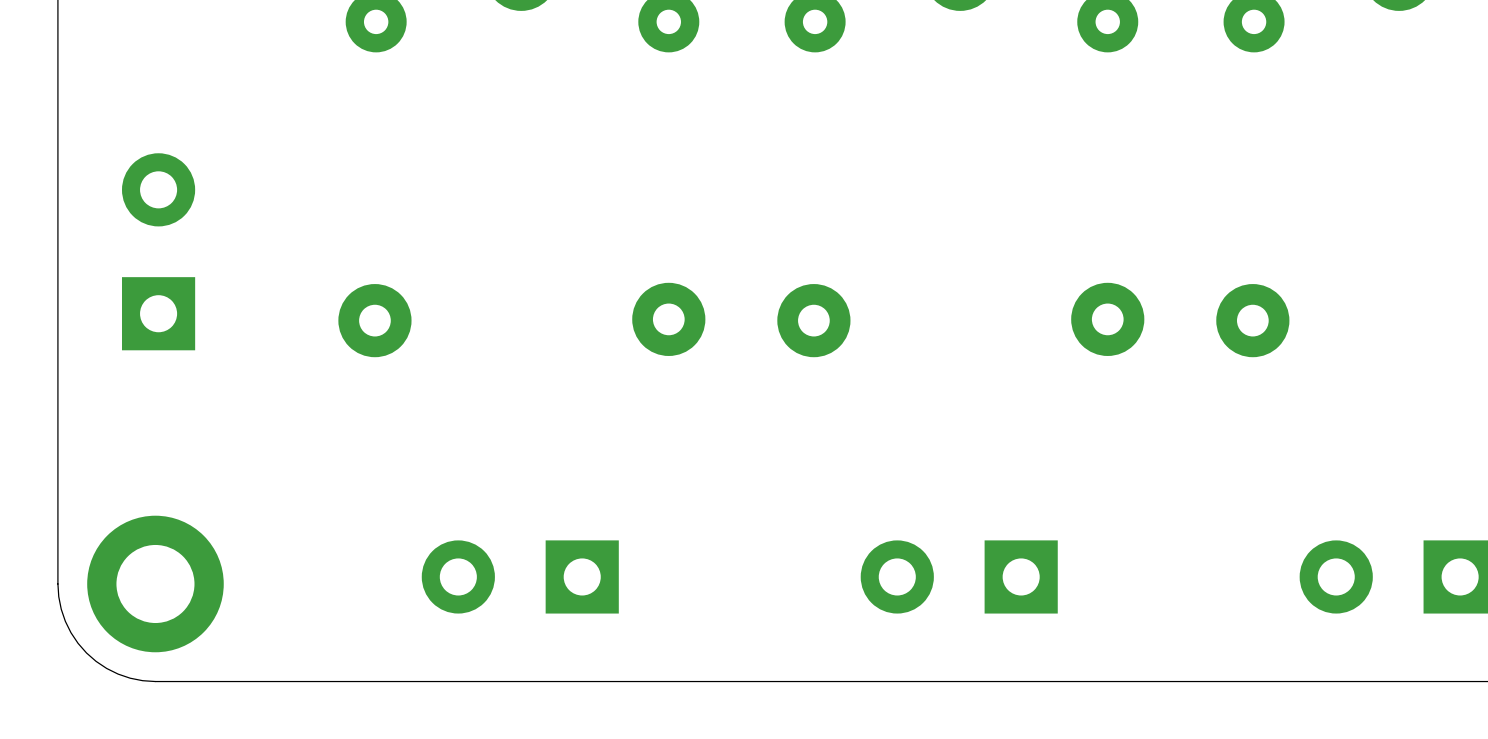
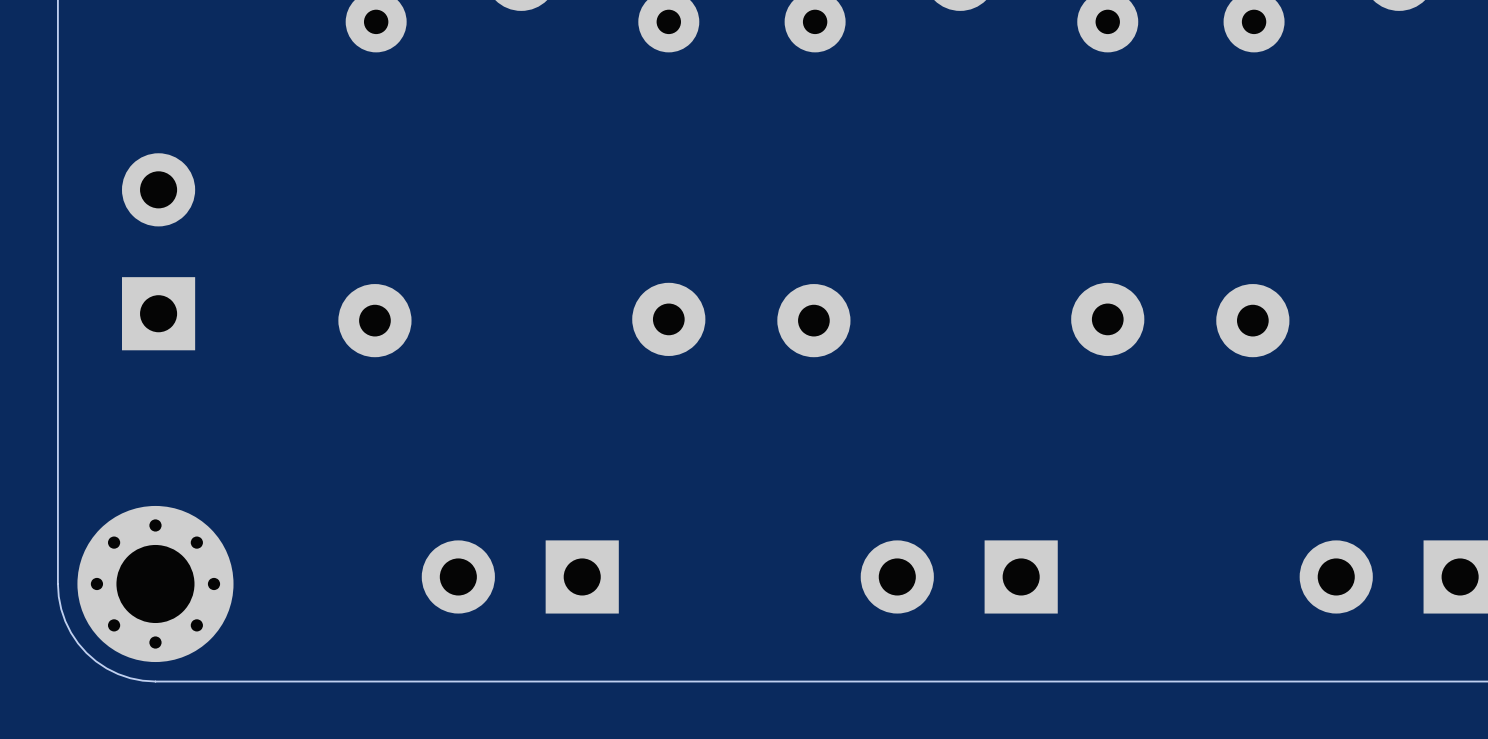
part footprint: [87, 515, 224, 653] -> [77, 505, 234, 663]

